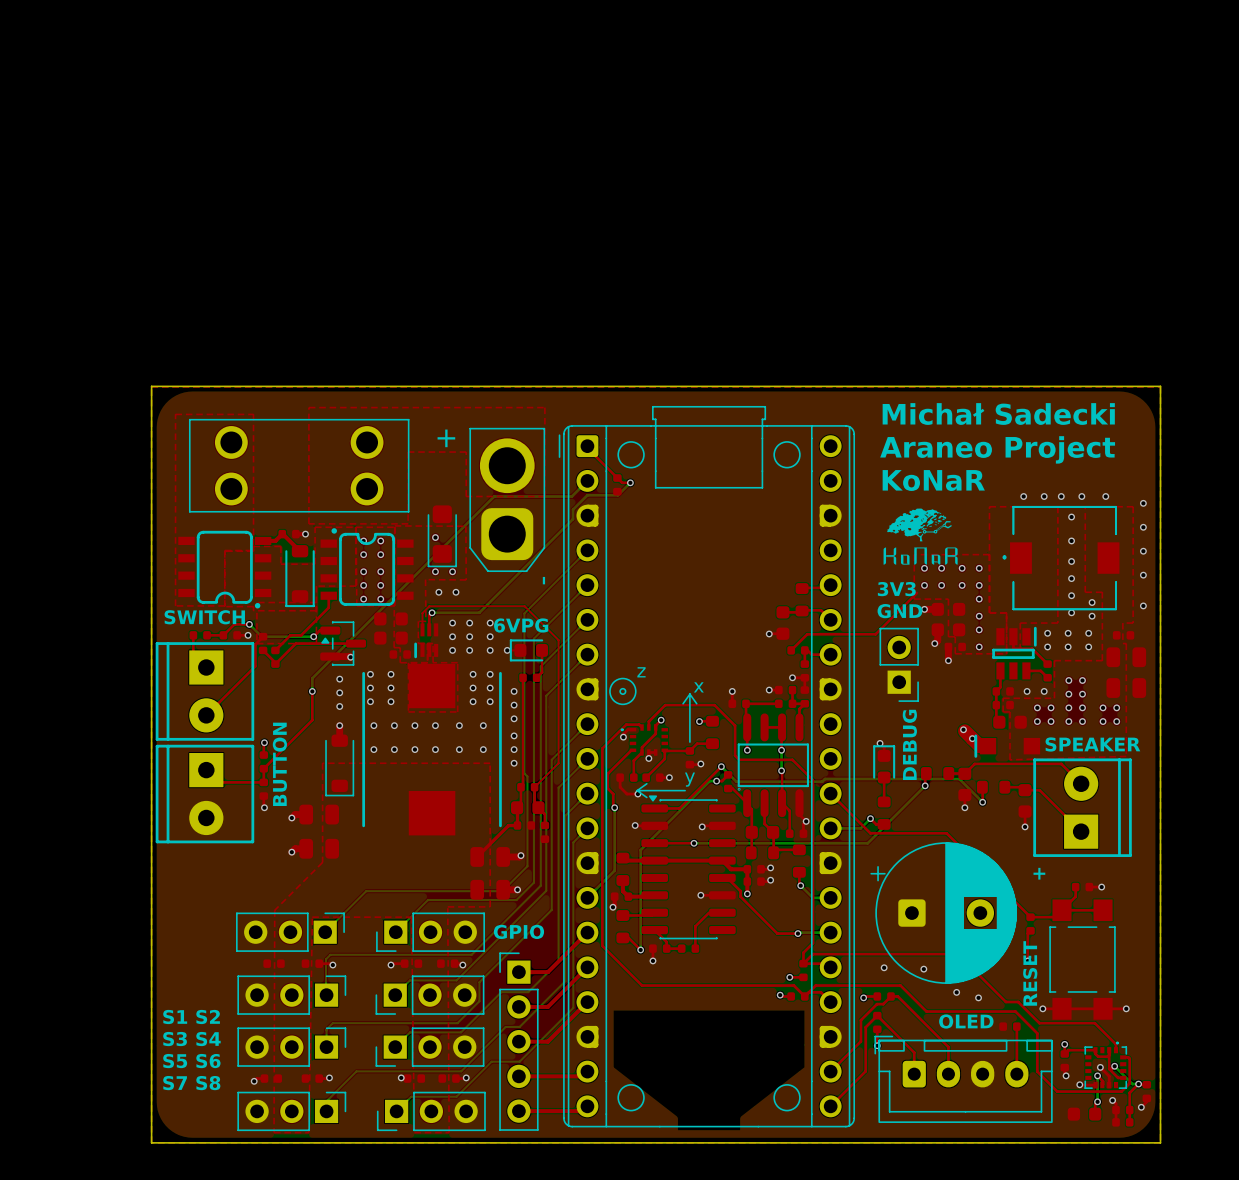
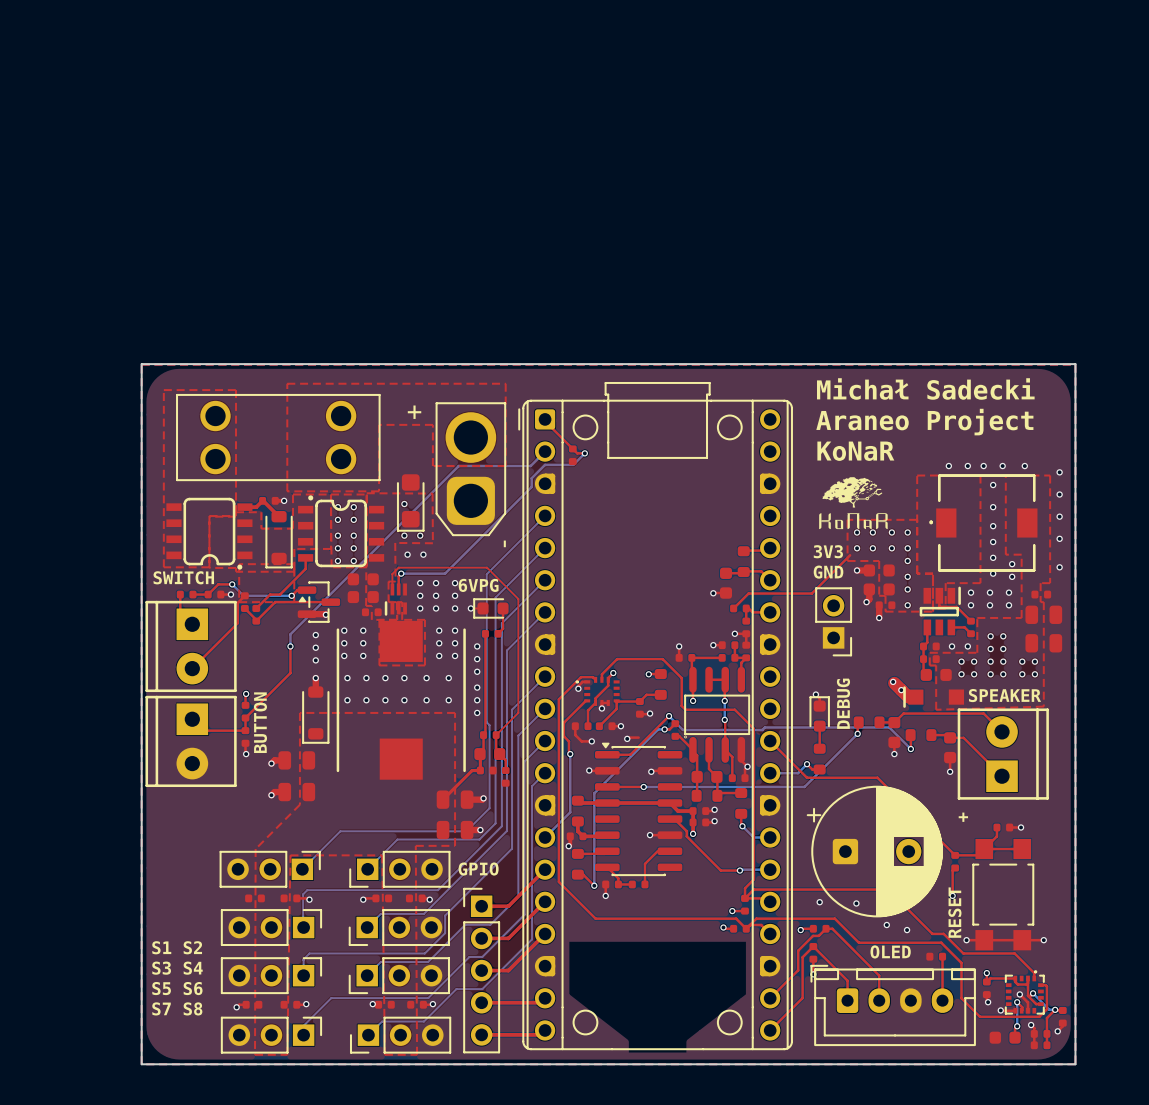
text: z (641, 672) -> none
drawing: [609, 677, 637, 706] -> none
text: x (698, 687) -> none
line: (689, 694) (683, 703) -> none
line: (689, 694) (696, 703) -> none
line: (689, 694) (689, 742) -> none
text: y (689, 779) -> none
line: (646, 783) (637, 790) -> none
top track: none -> (638, 737) (627, 738)
line: (637, 790) (646, 797) -> none
line: (637, 790) (685, 790) -> none
via: none -> (627, 738)

